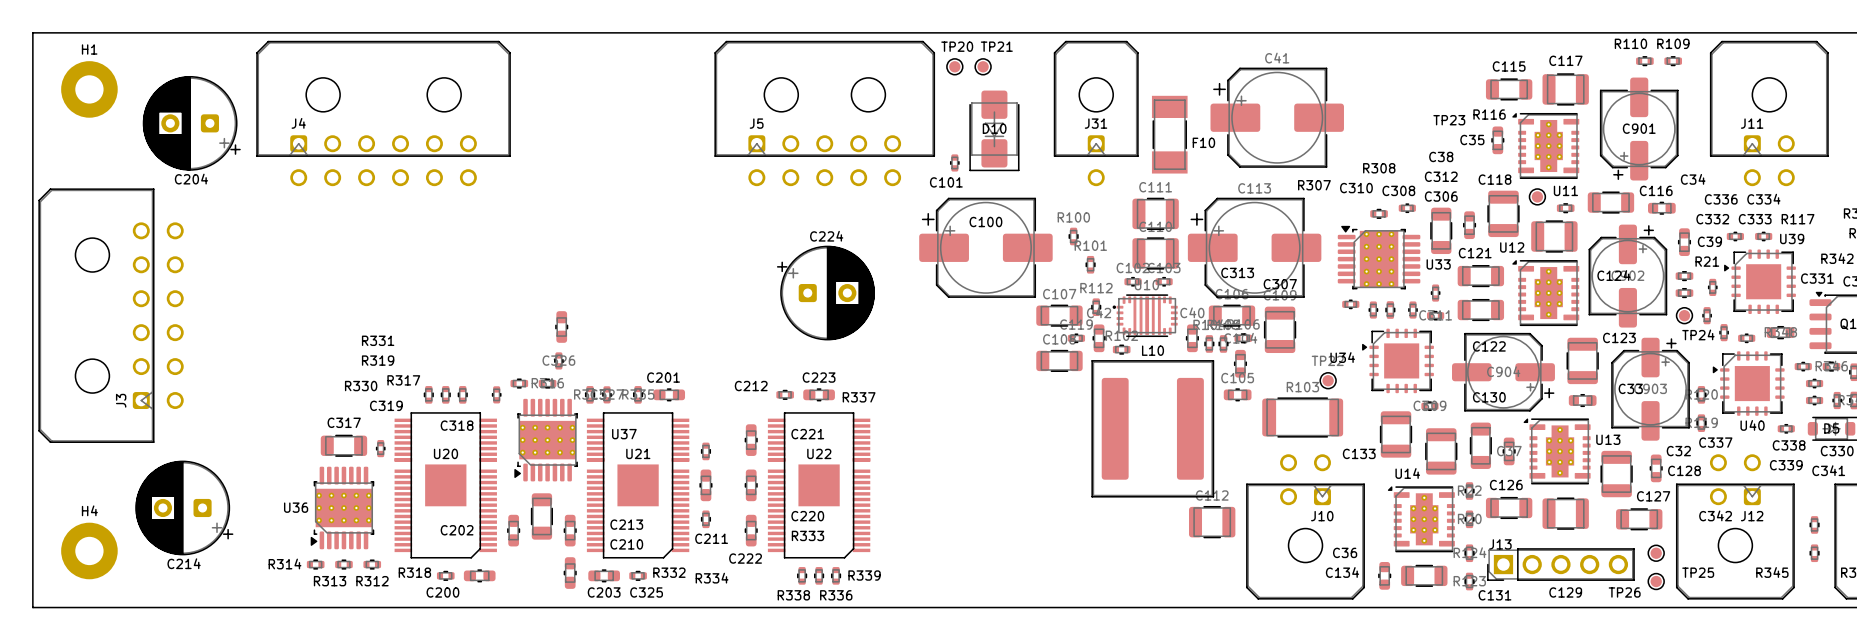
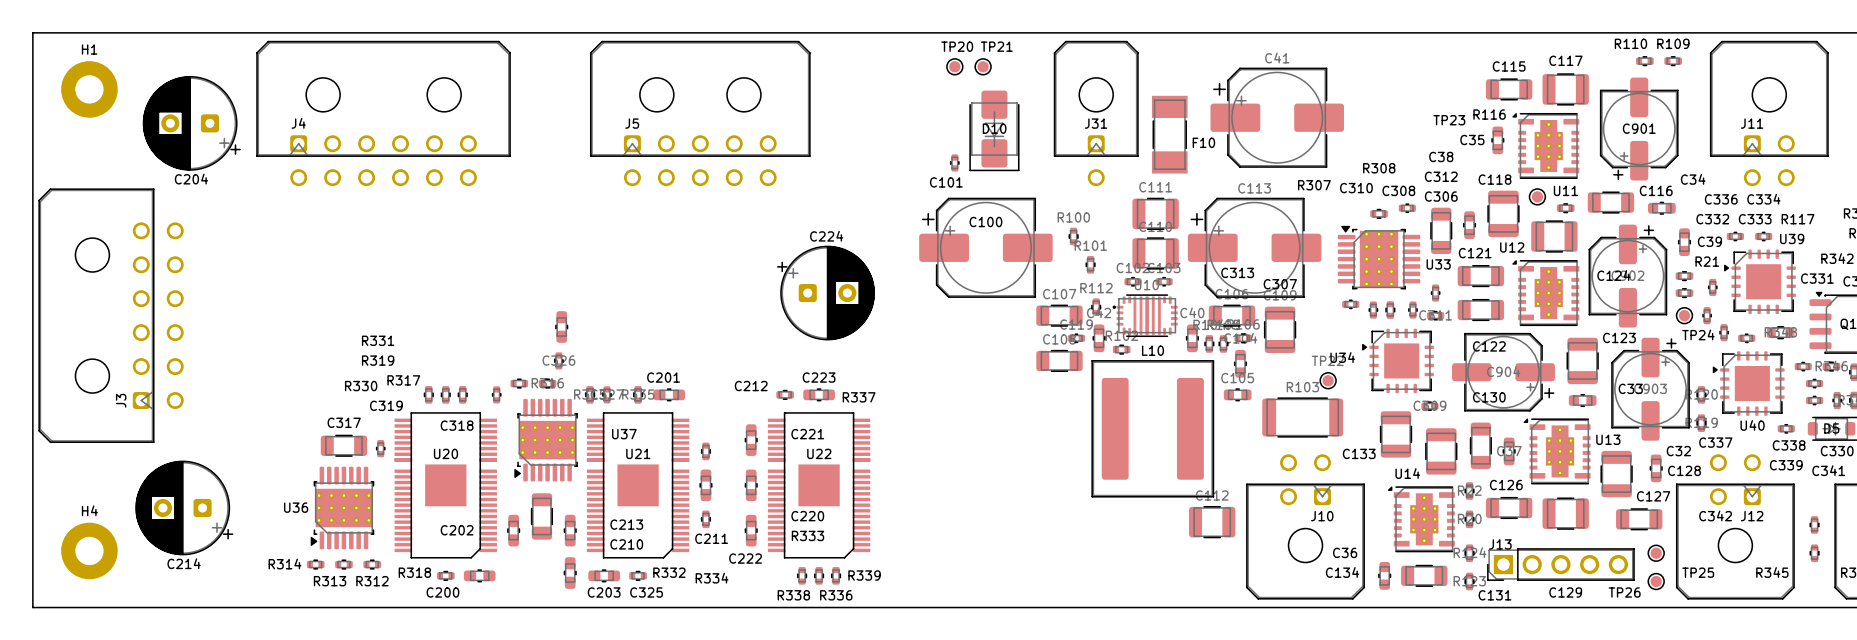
J5 position: (824, 113) -> (700, 113)

